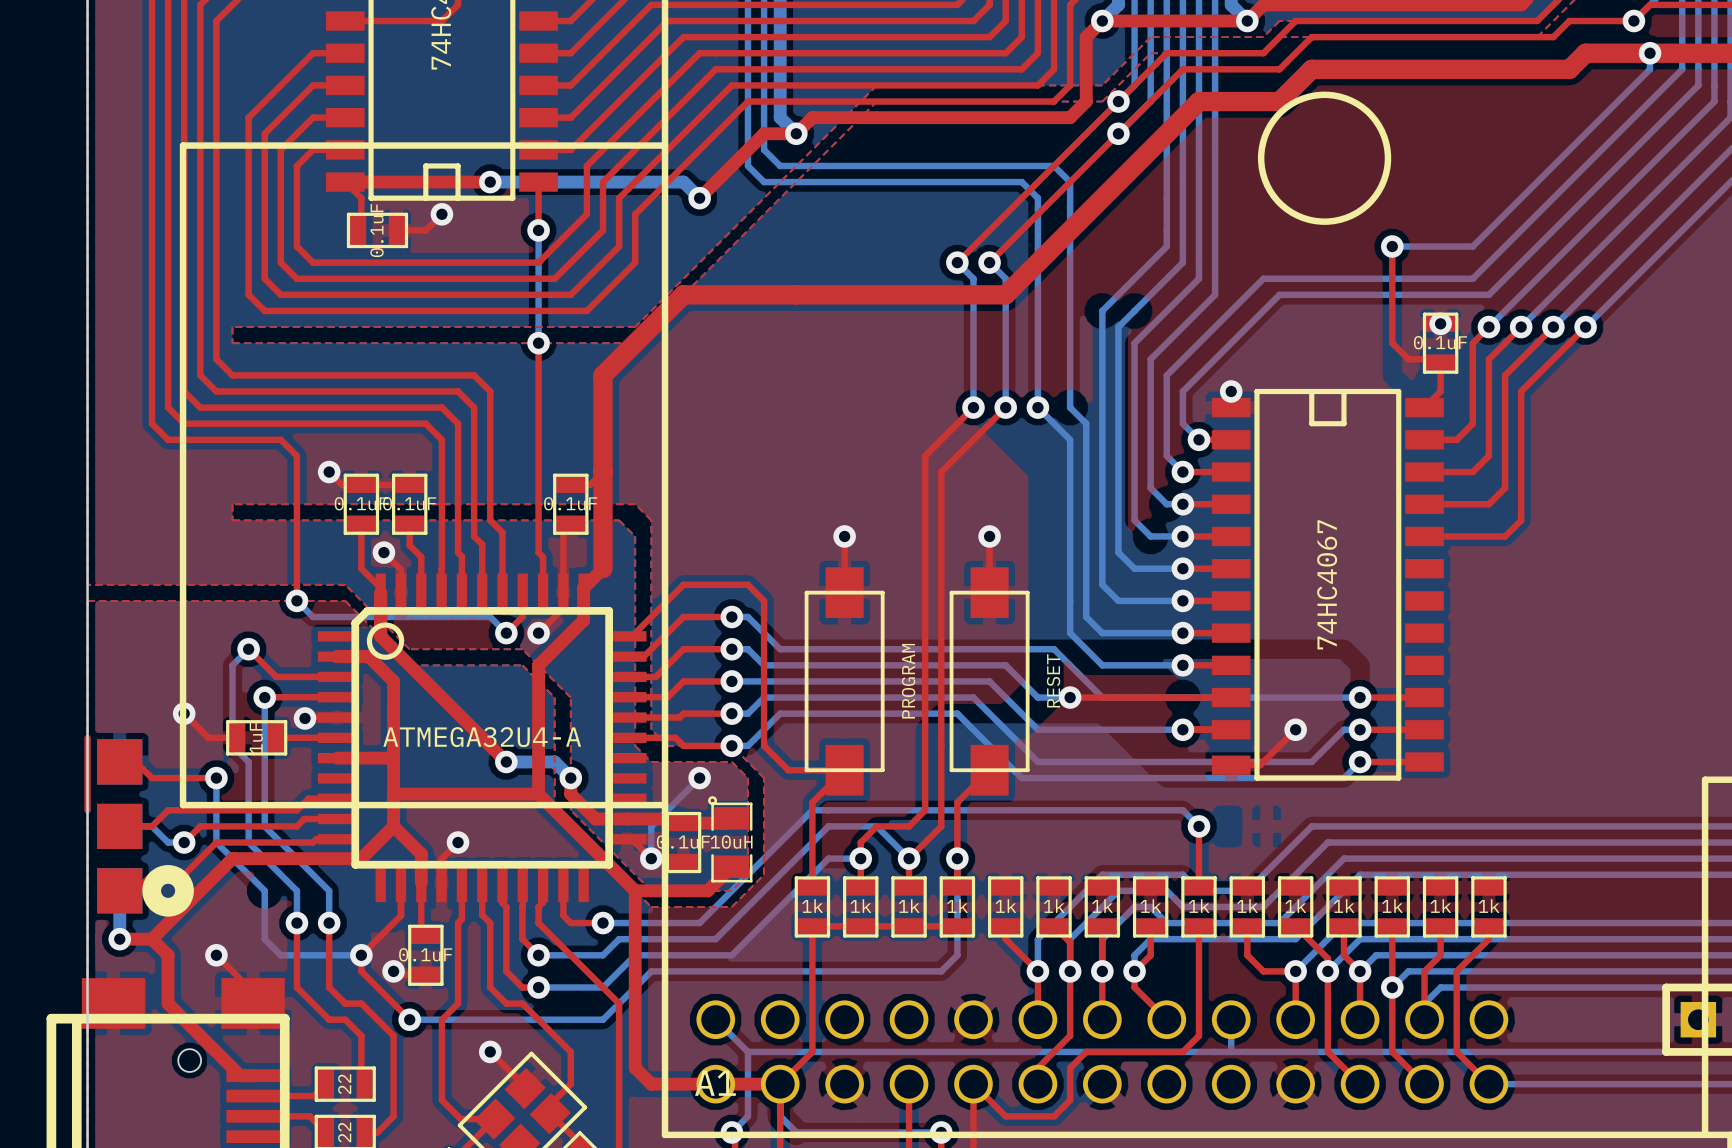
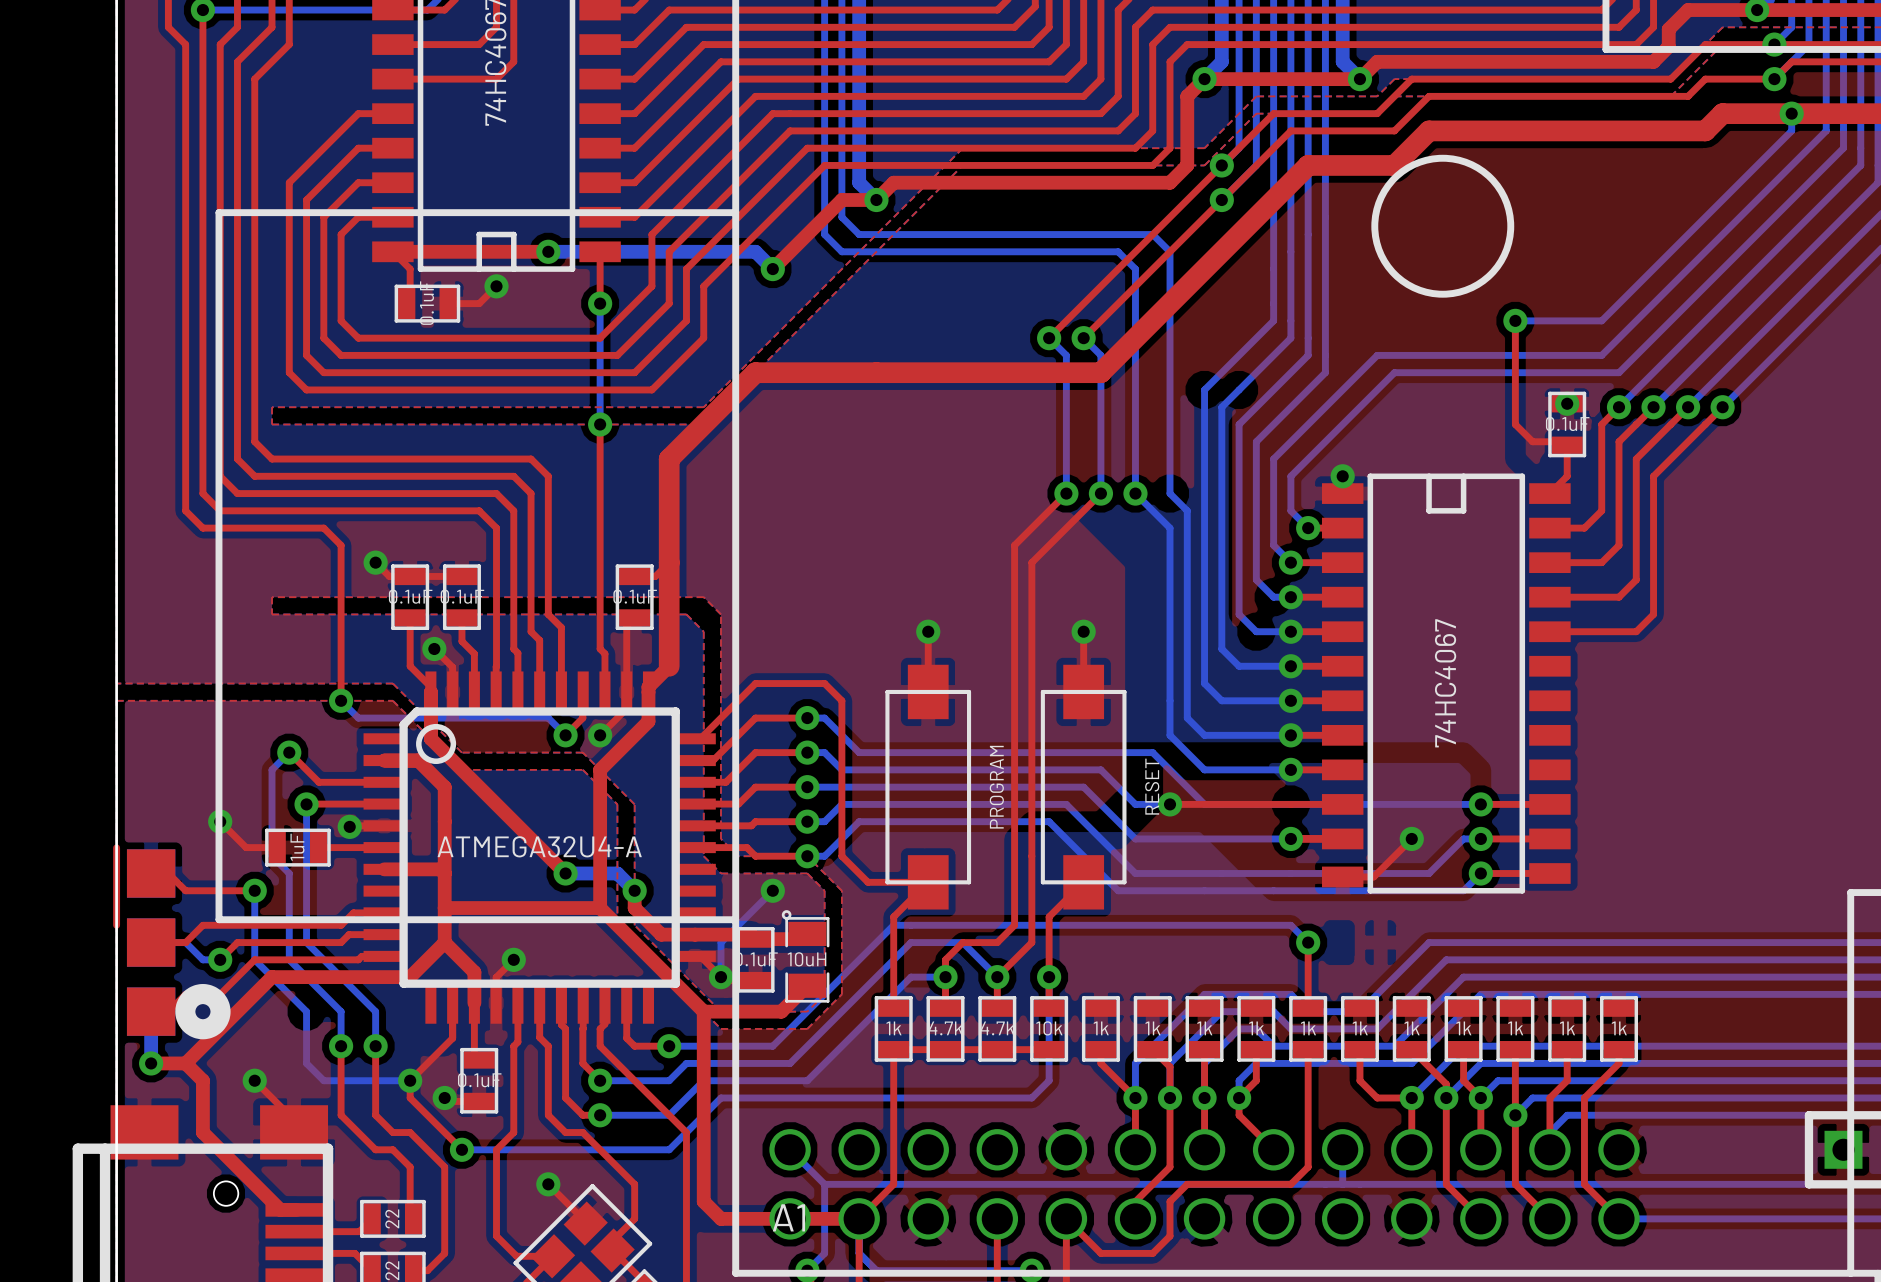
part value: 1k (860, 906) -> 4.7k (945, 1028)
part value: 1k (909, 906) -> 4.7k (997, 1028)
part value: 1k (957, 906) -> 10k (1049, 1028)

